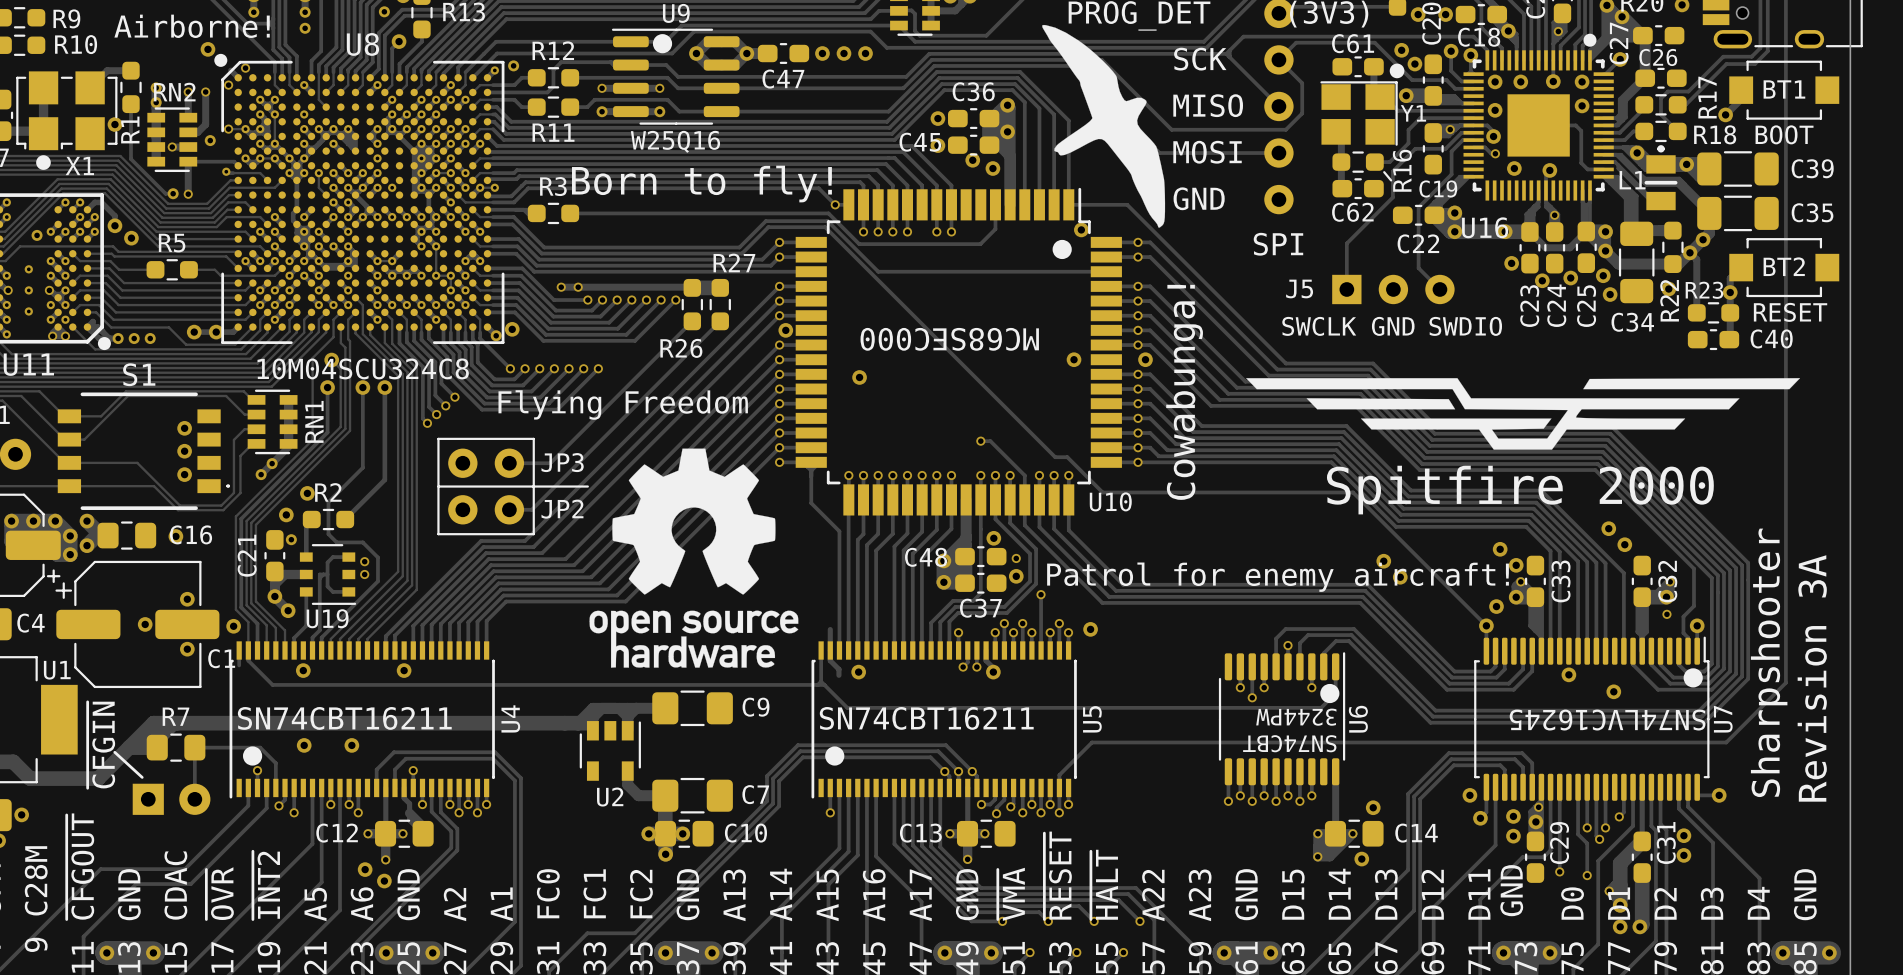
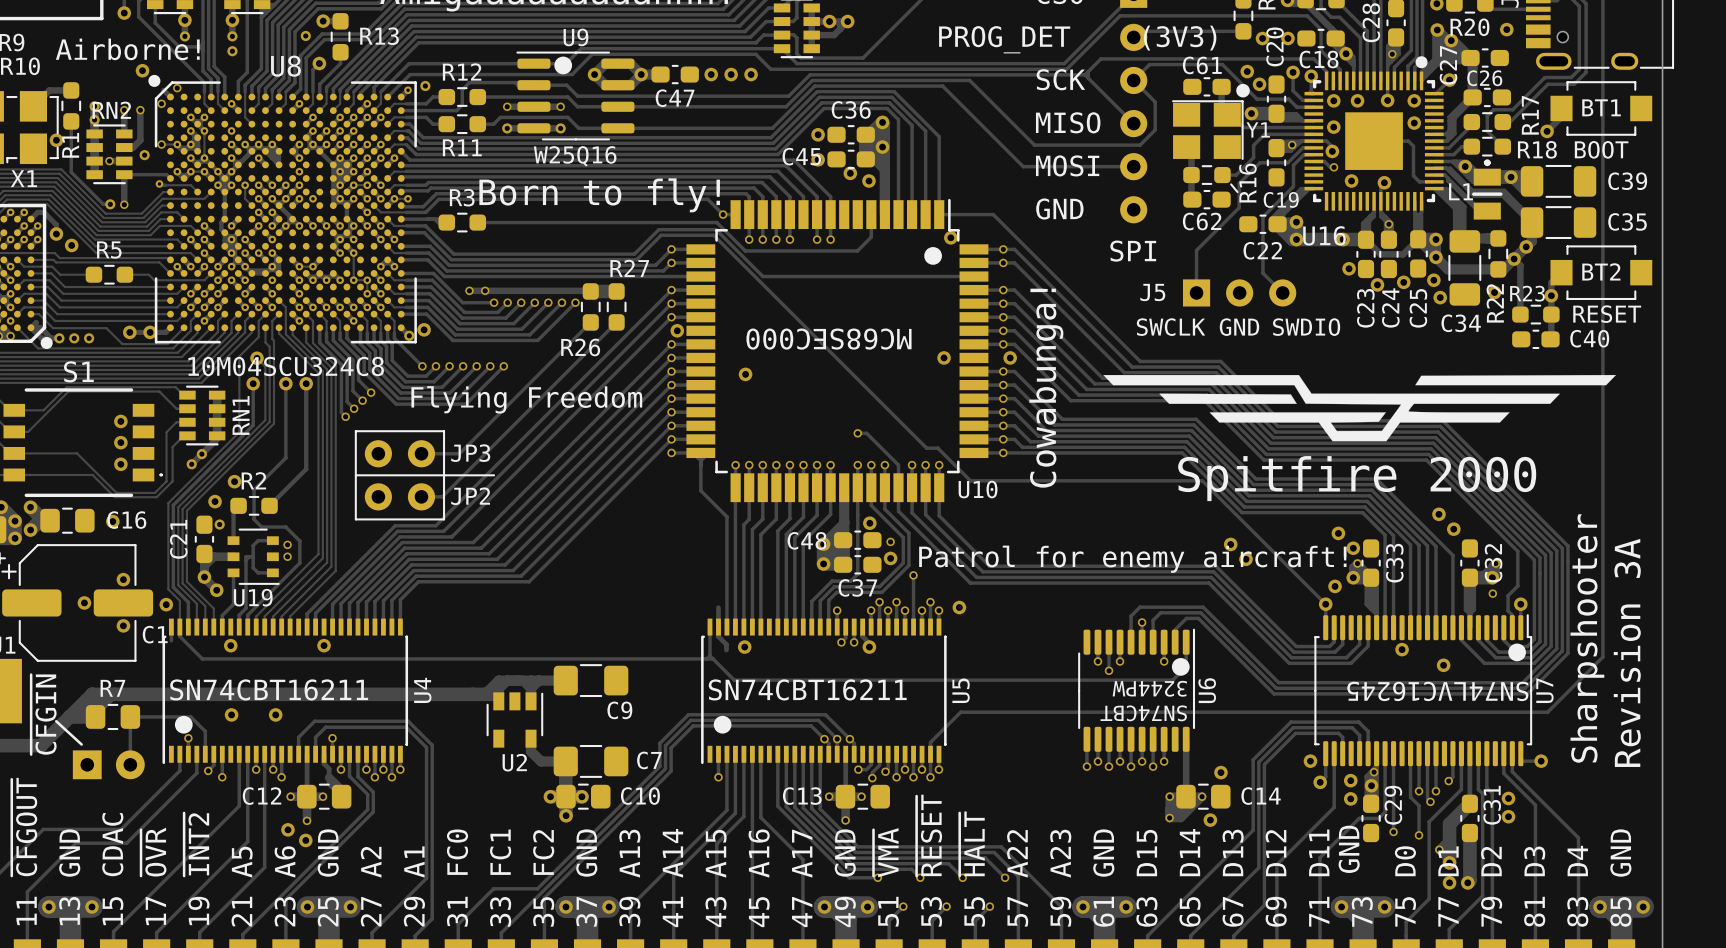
drawing: [1042, 24, 1166, 228] -> none
drawing: [589, 448, 799, 668] -> none
C9 name position: C9 (756, 707) -> C9 (619, 710)

